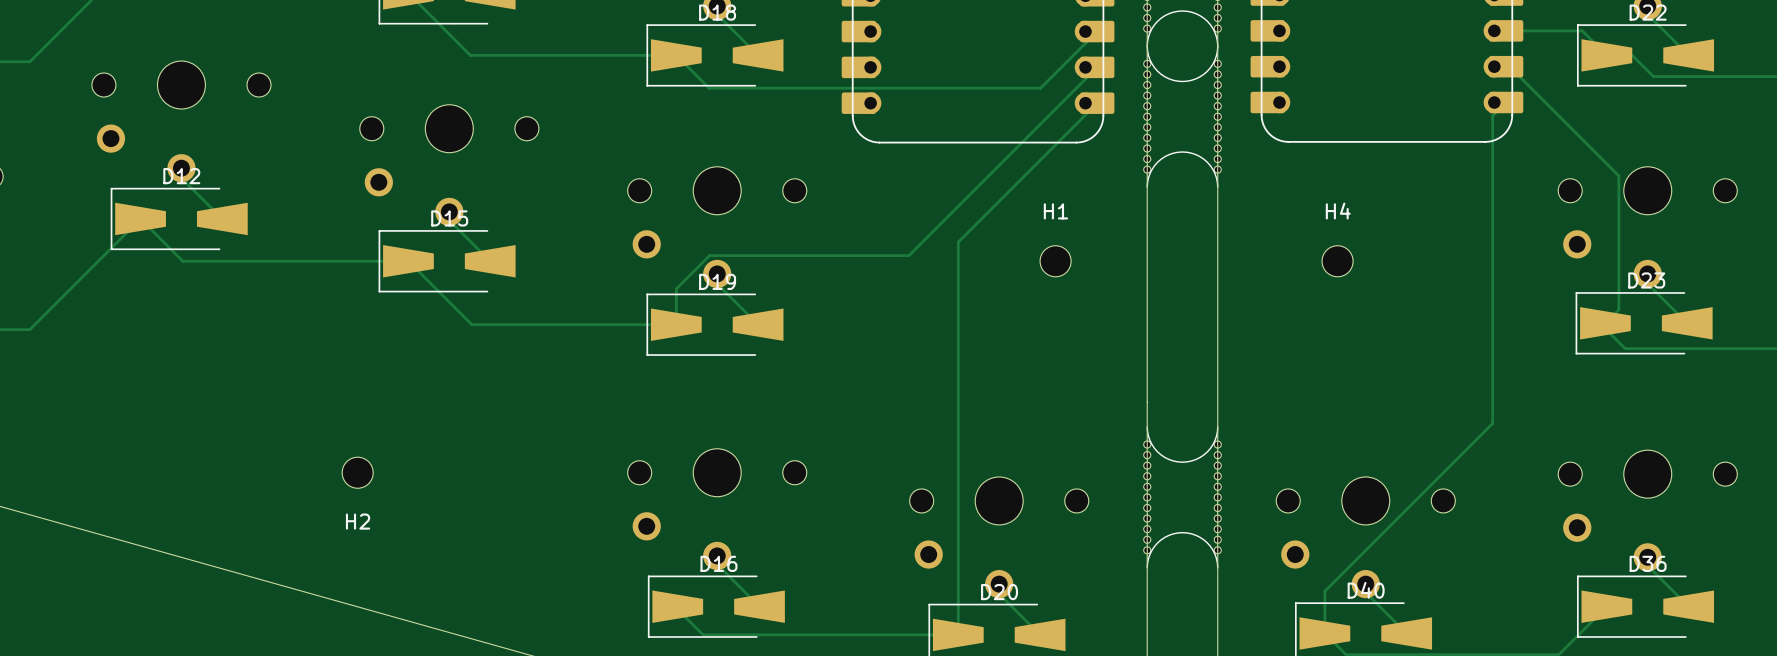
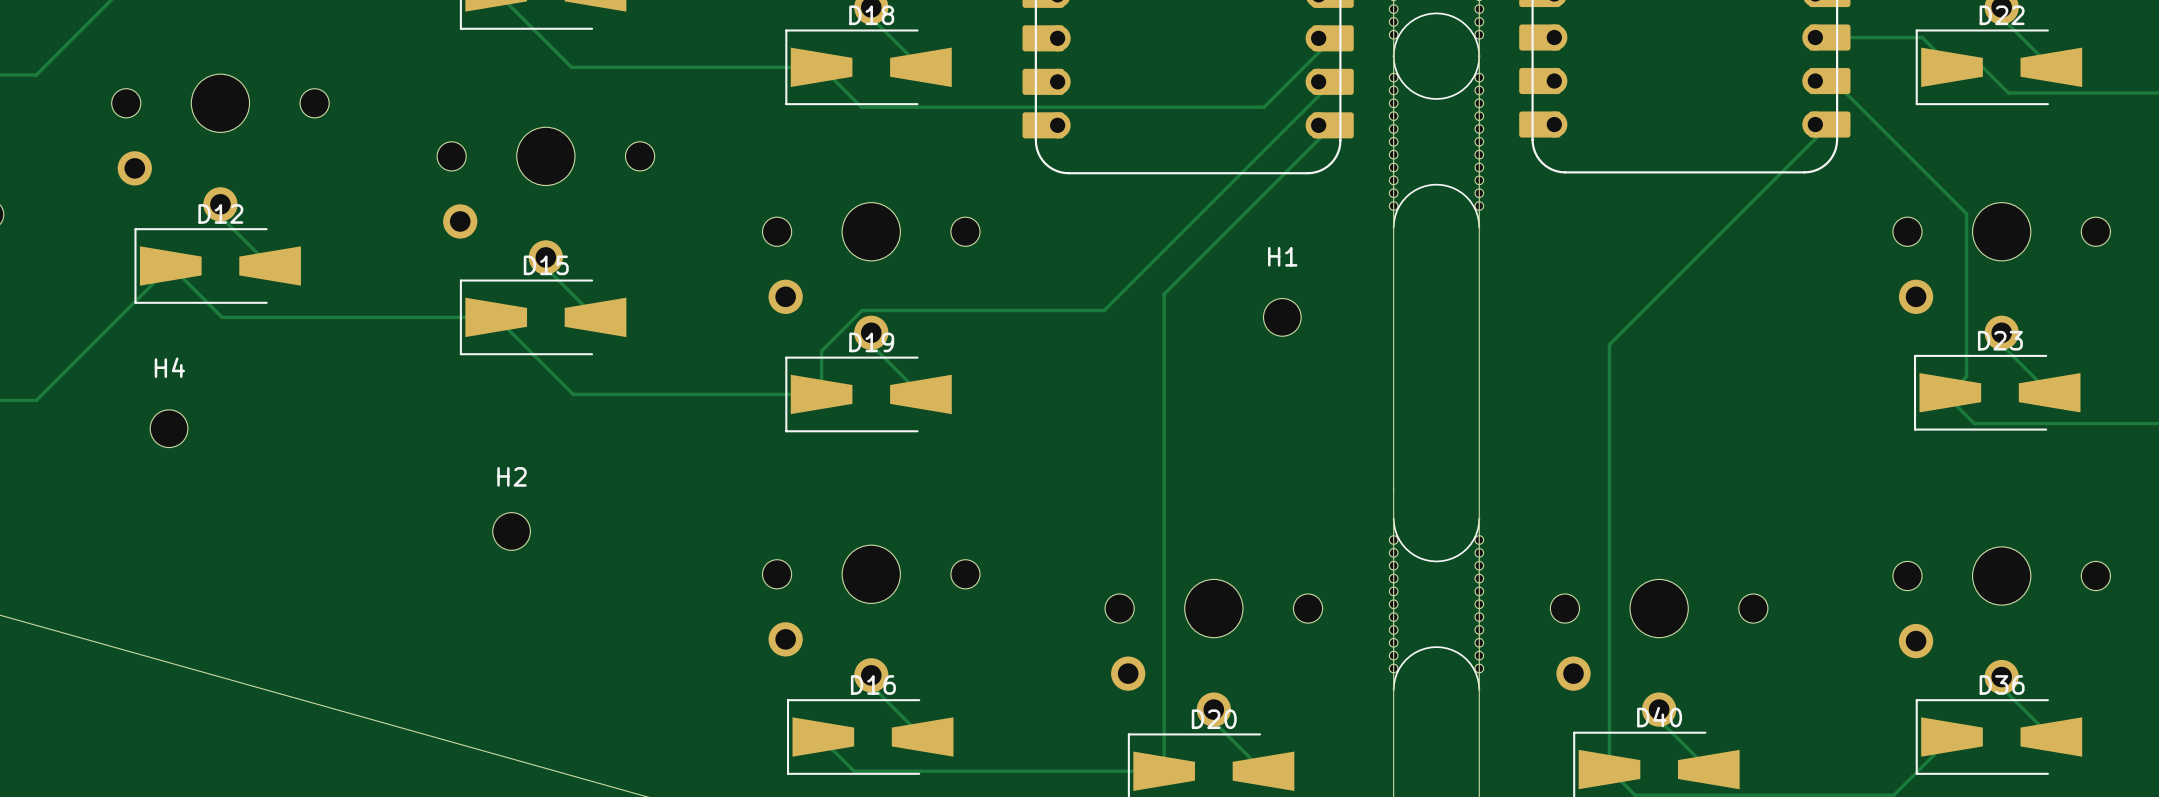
track: (1492, 115) (1492, 423) (1324, 591) -> (1813, 140) (1609, 344) (1609, 718)
H4 position: (1337, 261) -> (169, 428)
H2 position: (357, 472) -> (511, 531)
H2 name position: H2 (358, 521) -> H2 (512, 476)

